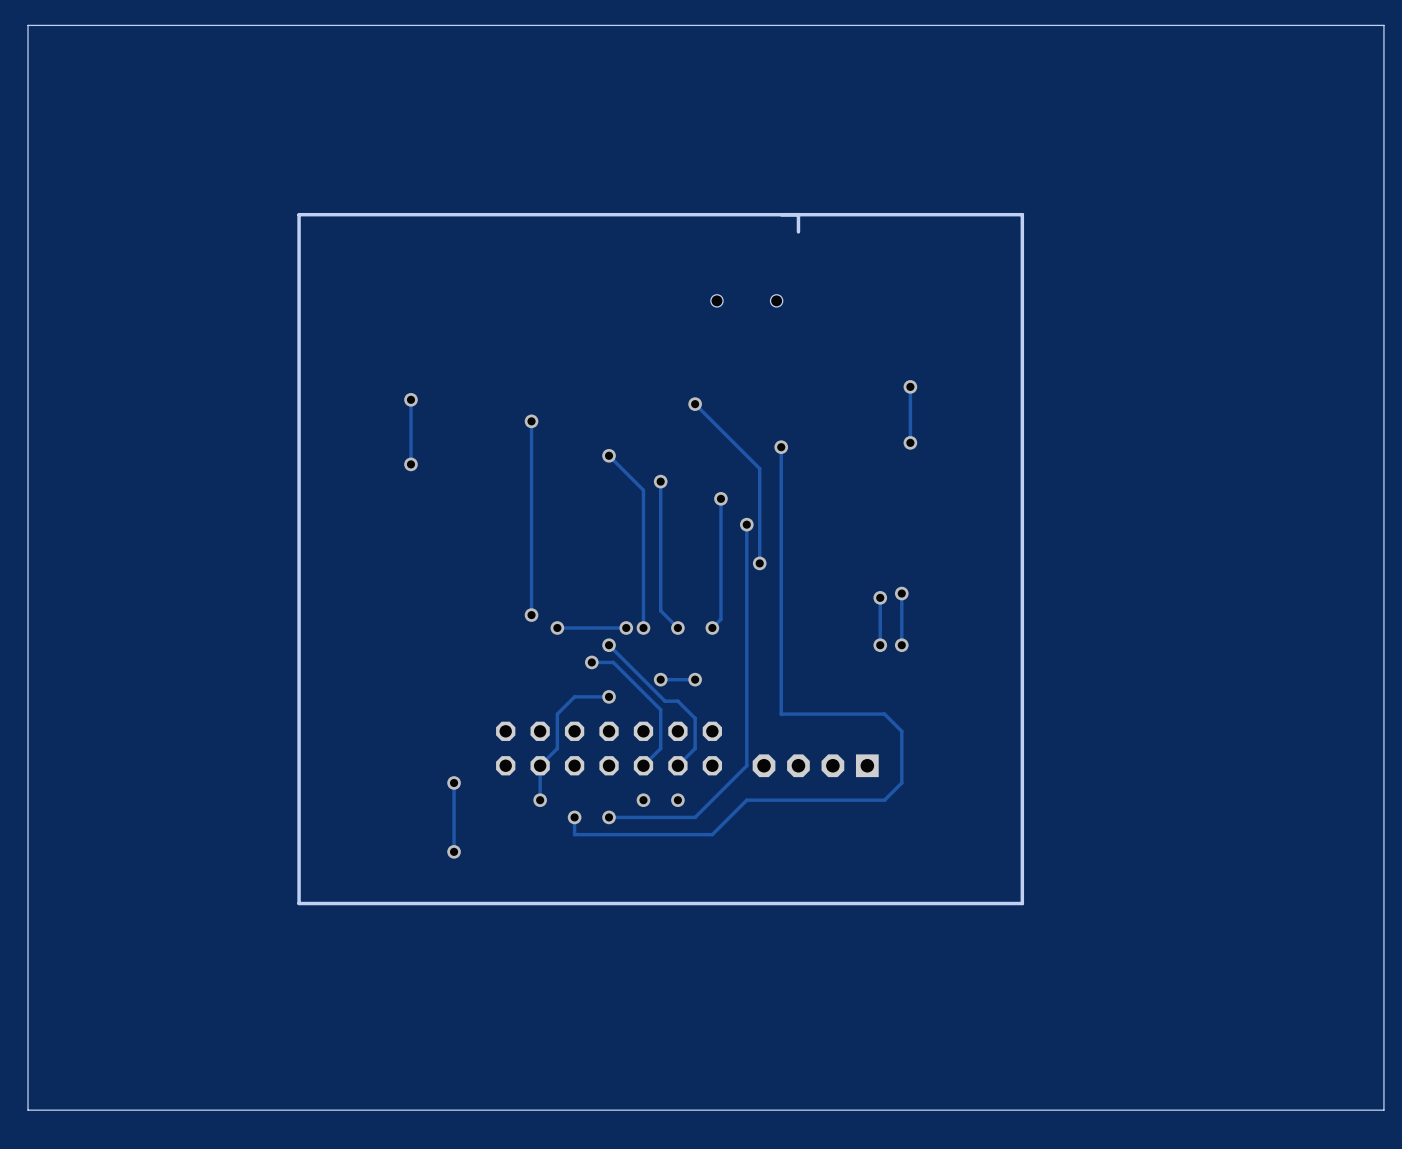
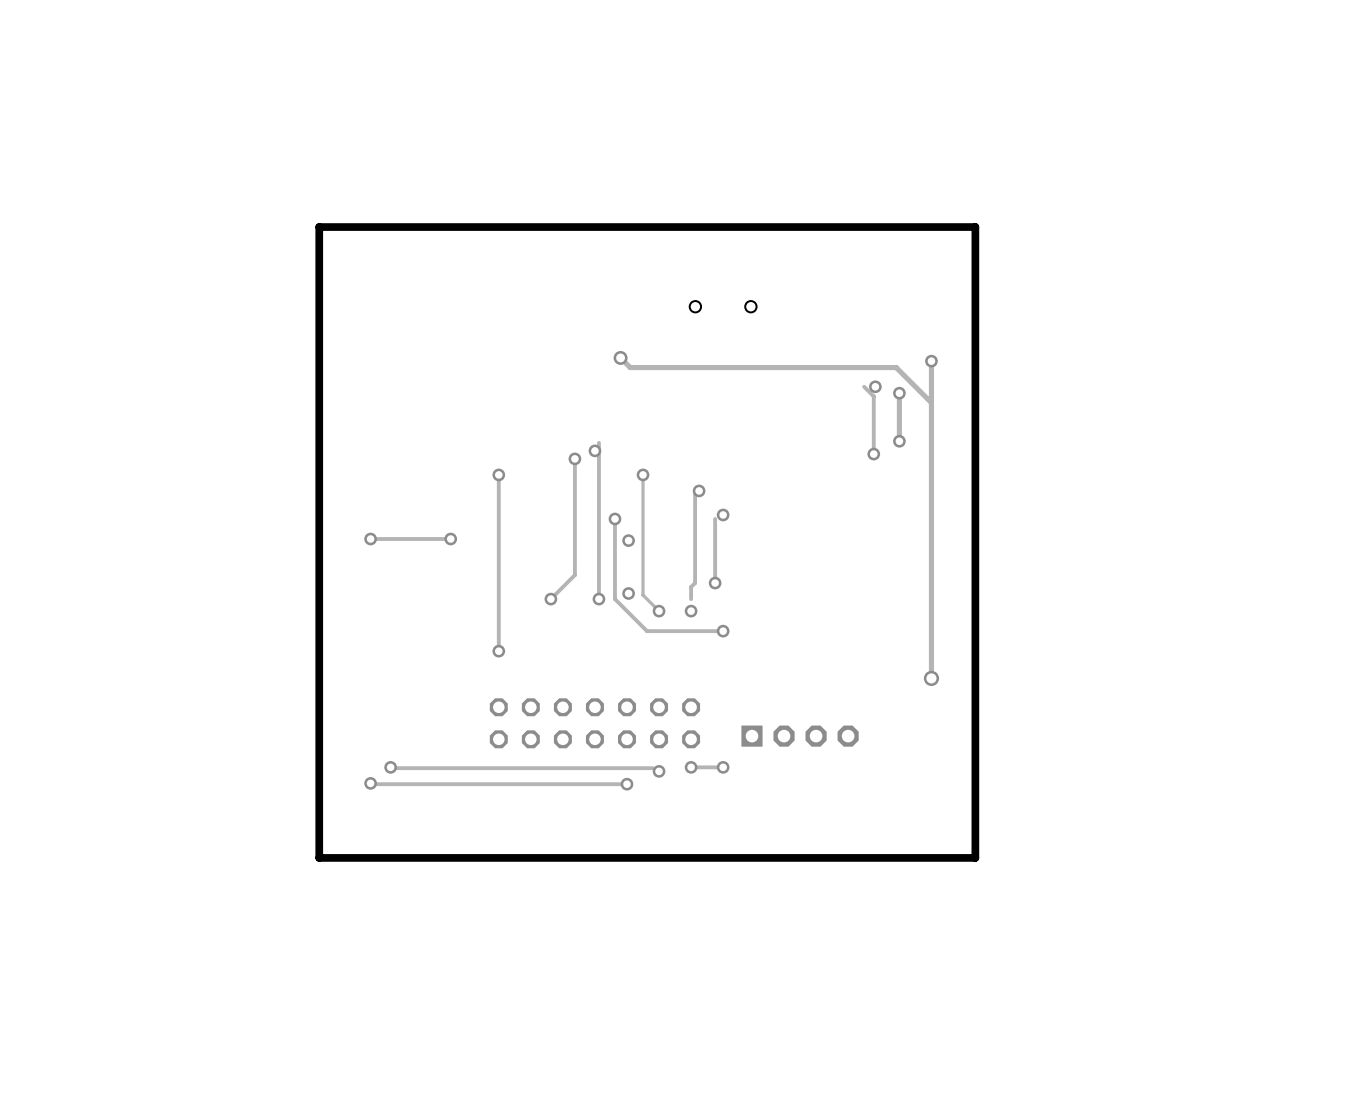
board edge: (1383, 25) (28, 25) (28, 1110) (1383, 1110) (1383, 25) -> none
board edge: (798, 214) (798, 231) -> none
board edge: (1022, 214) (299, 214) (299, 903) (1022, 903) (1022, 214) -> (975, 227) (975, 857) (319, 857) (319, 227) (975, 227)
track: none -> (620, 357) (630, 367) (896, 367) (931, 402)
via: none -> (620, 357)
track: none -> (931, 361) (931, 678)
via: none -> (931, 361)
track: none -> (864, 386) (873, 396) (873, 454)
track: (910, 386) (910, 442) -> none
via: none -> (899, 393)
track: (410, 399) (410, 464) -> none
via: (410, 399) -> none
track: (695, 404) (759, 468) (759, 563) -> none
via: (695, 404) -> none
track: (531, 421) (531, 615) -> none
via: (531, 421) -> none
via: (910, 442) -> none
via: none -> (899, 441)
track: none -> (598, 442) (598, 599)
track: (781, 447) (781, 714) (884, 714) (901, 731) (901, 782) (884, 800) (746, 800) (712, 834) (574, 834) (574, 817) -> none
via: (781, 447) -> none
track: (609, 455) (643, 490) (643, 627) -> none
via: none -> (873, 454)
via: (410, 464) -> none
track: none -> (574, 458) (574, 575) (550, 599)
via: none -> (574, 458)
track: none -> (498, 474) (498, 651)
via: none -> (498, 474)
track: none -> (695, 490) (695, 583) (691, 587) (691, 599)
track: (720, 498) (720, 619) (712, 627) -> none
track: (746, 524) (746, 765) (695, 817) (609, 817) -> none
track: none -> (614, 518) (614, 599) (647, 631) (723, 631)
via: none -> (614, 518)
track: none -> (715, 518) (715, 583)
via: none -> (370, 539)
track: none -> (450, 539) (370, 539)
via: none -> (450, 539)
via: none -> (628, 540)
via position: (759, 563) -> (715, 583)
track: (901, 593) (901, 645) -> (899, 393) (899, 441)
via: (901, 593) -> none
track: (880, 597) (880, 645) -> none
via: (880, 597) -> none
via: none -> (628, 593)
via: (531, 615) -> none
via: none -> (598, 599)
via position: (557, 627) -> (550, 599)
track: (626, 627) (557, 627) -> none
via: (626, 627) -> none
via: (643, 627) -> none
track: (609, 645) (665, 701) (677, 701) (695, 718) (695, 748) (677, 765) -> none
via: (609, 645) -> none
via: (880, 645) -> none
via: (901, 645) -> none
via: none -> (723, 631)
track: (591, 662) (613, 662) (660, 709) (660, 748) (643, 765) -> none
via: (591, 662) -> none
via: none -> (498, 651)
via: (660, 679) -> none
track: (695, 679) (660, 679) -> (723, 767) (691, 767)
via: (695, 679) -> none
track: (609, 696) (574, 696) (557, 714) (557, 748) (540, 765) (540, 800) -> none
via: (609, 696) -> none
via: none -> (931, 678)
part rotation: 0° (815, 765) -> 180° (800, 736)
track: (454, 782) (454, 851) -> none
via: (454, 782) -> none
track: none -> (390, 767) (652, 768)
via: none -> (390, 767)
via: none -> (691, 767)
via: none -> (723, 767)
via: (540, 800) -> none
via position: (643, 800) -> (626, 784)
track: none -> (370, 783) (626, 784)
via: none -> (370, 783)
via: (574, 817) -> none
via: (609, 817) -> none
via: (454, 851) -> none

